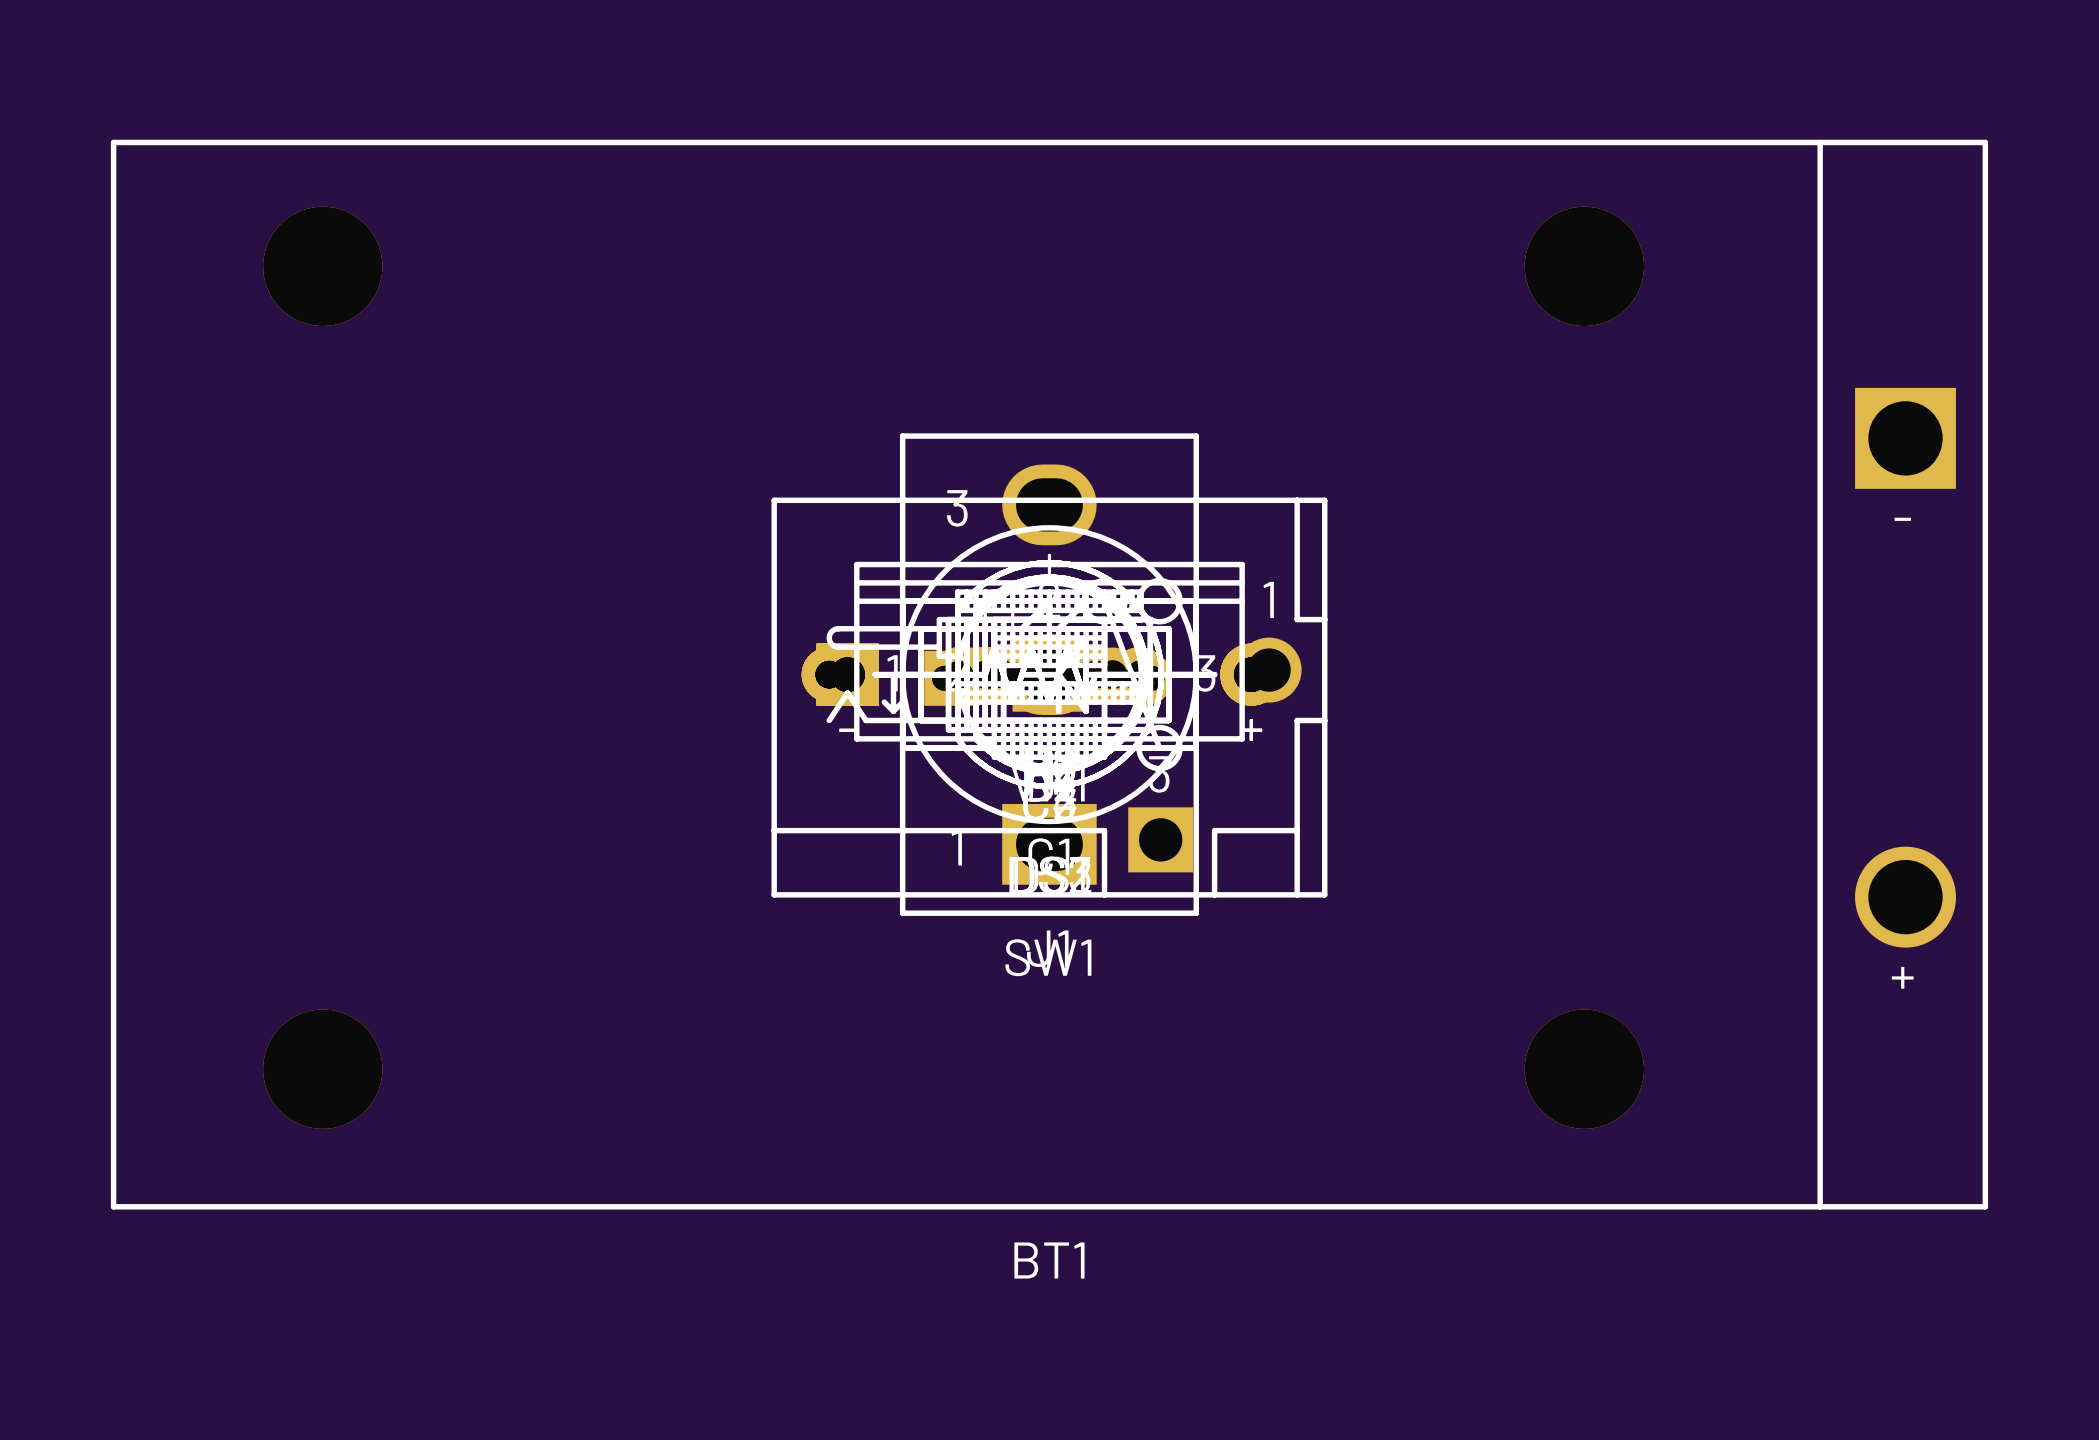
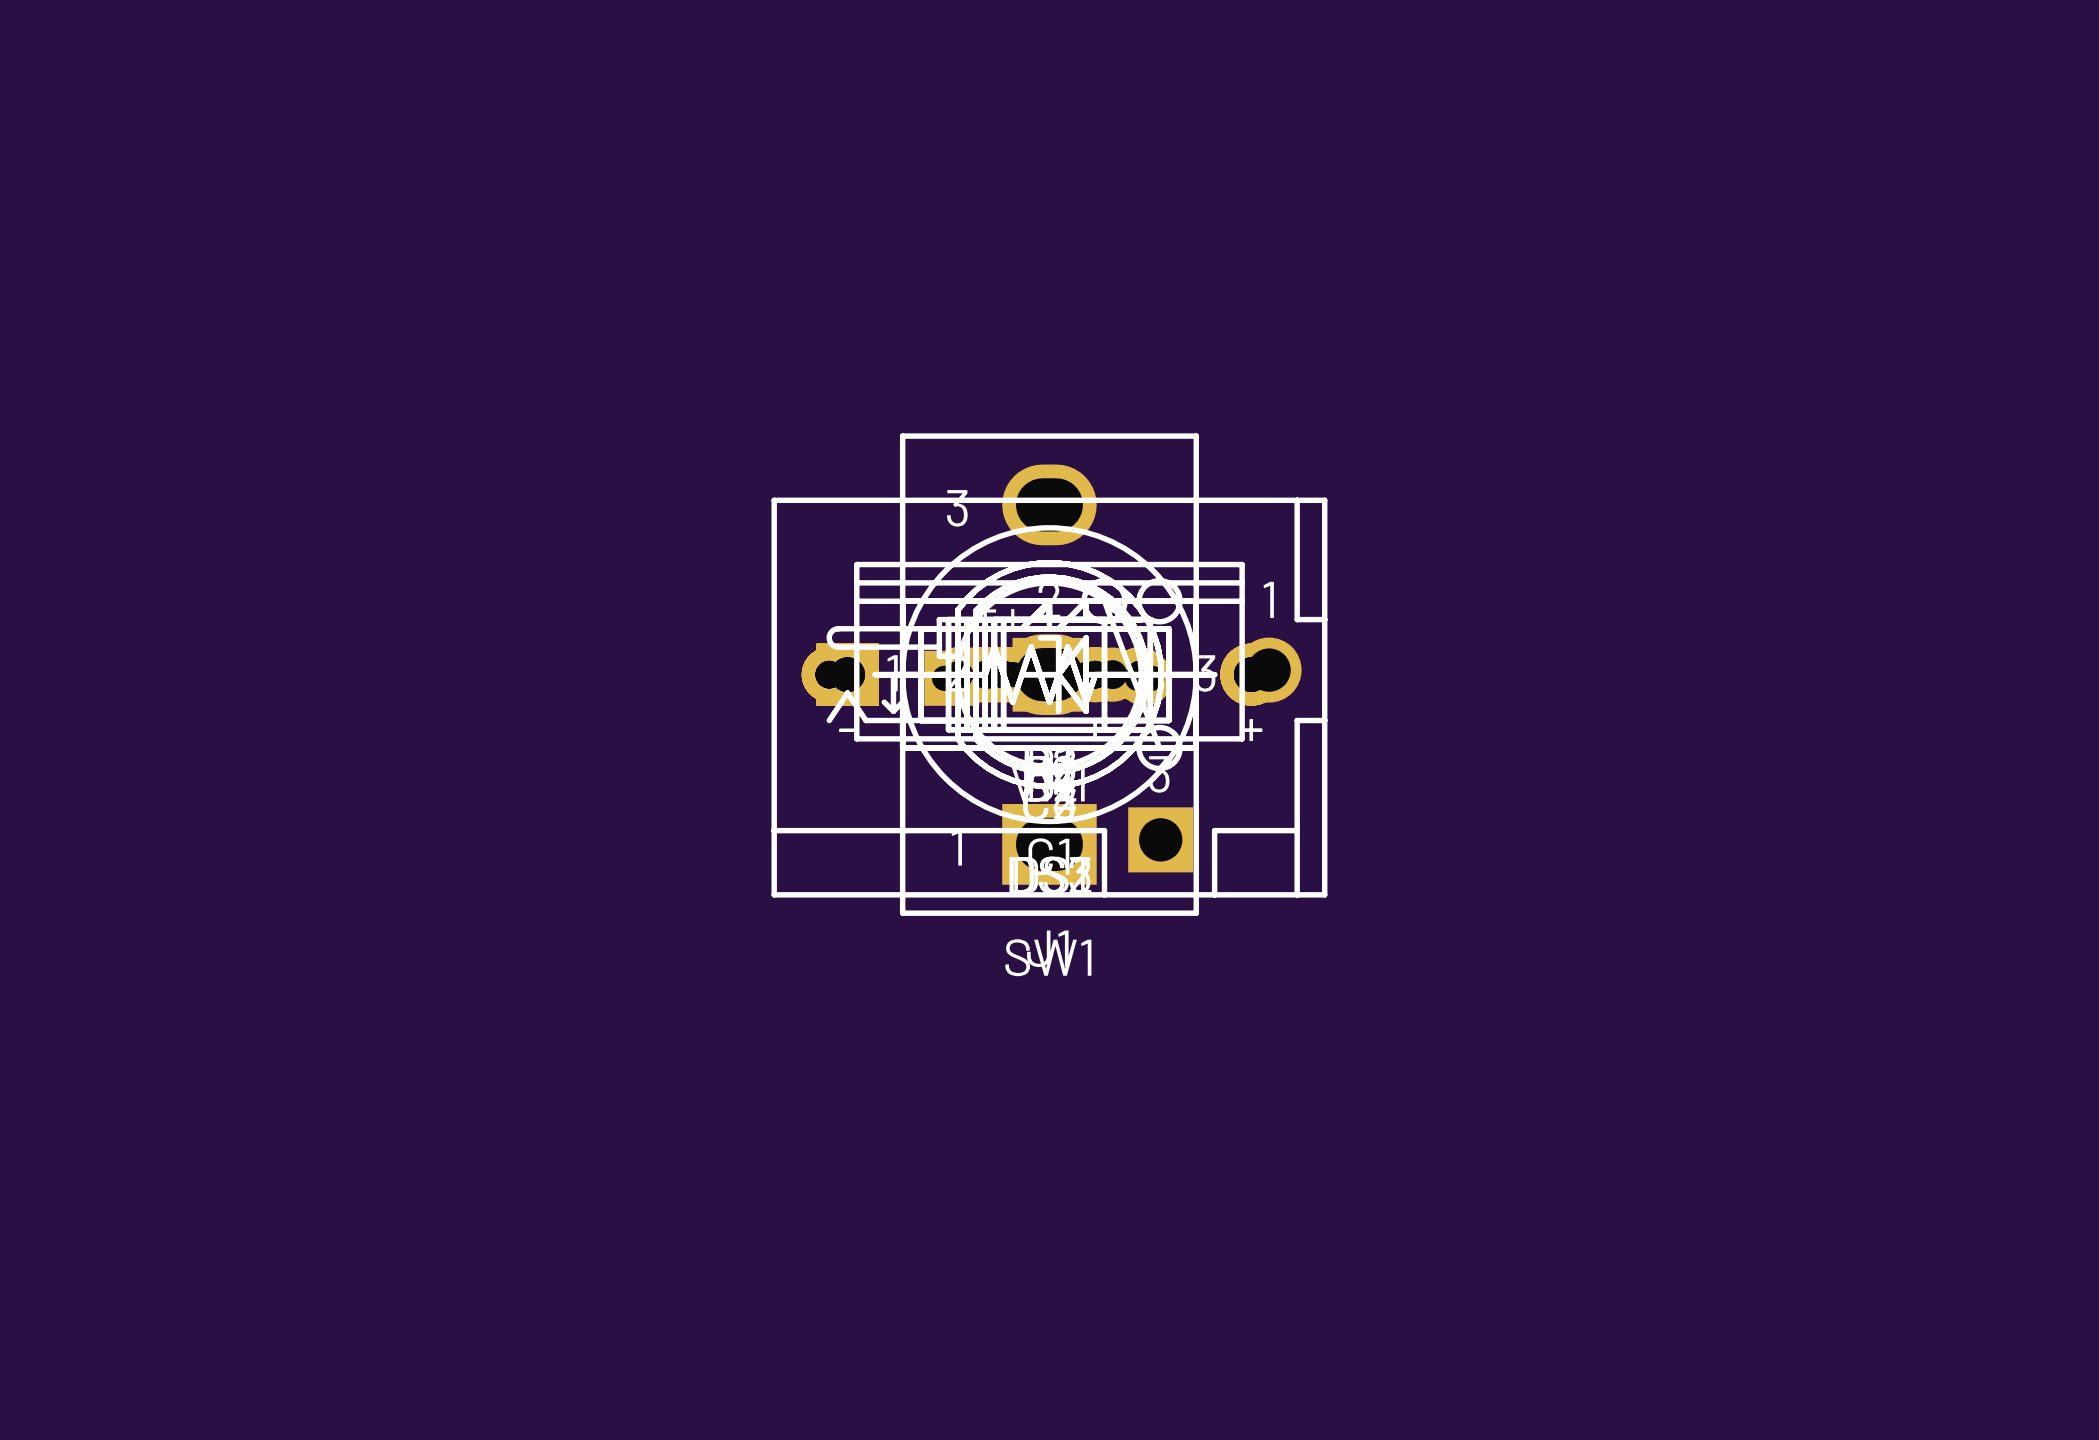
BT1: (1049, 674) -> none

